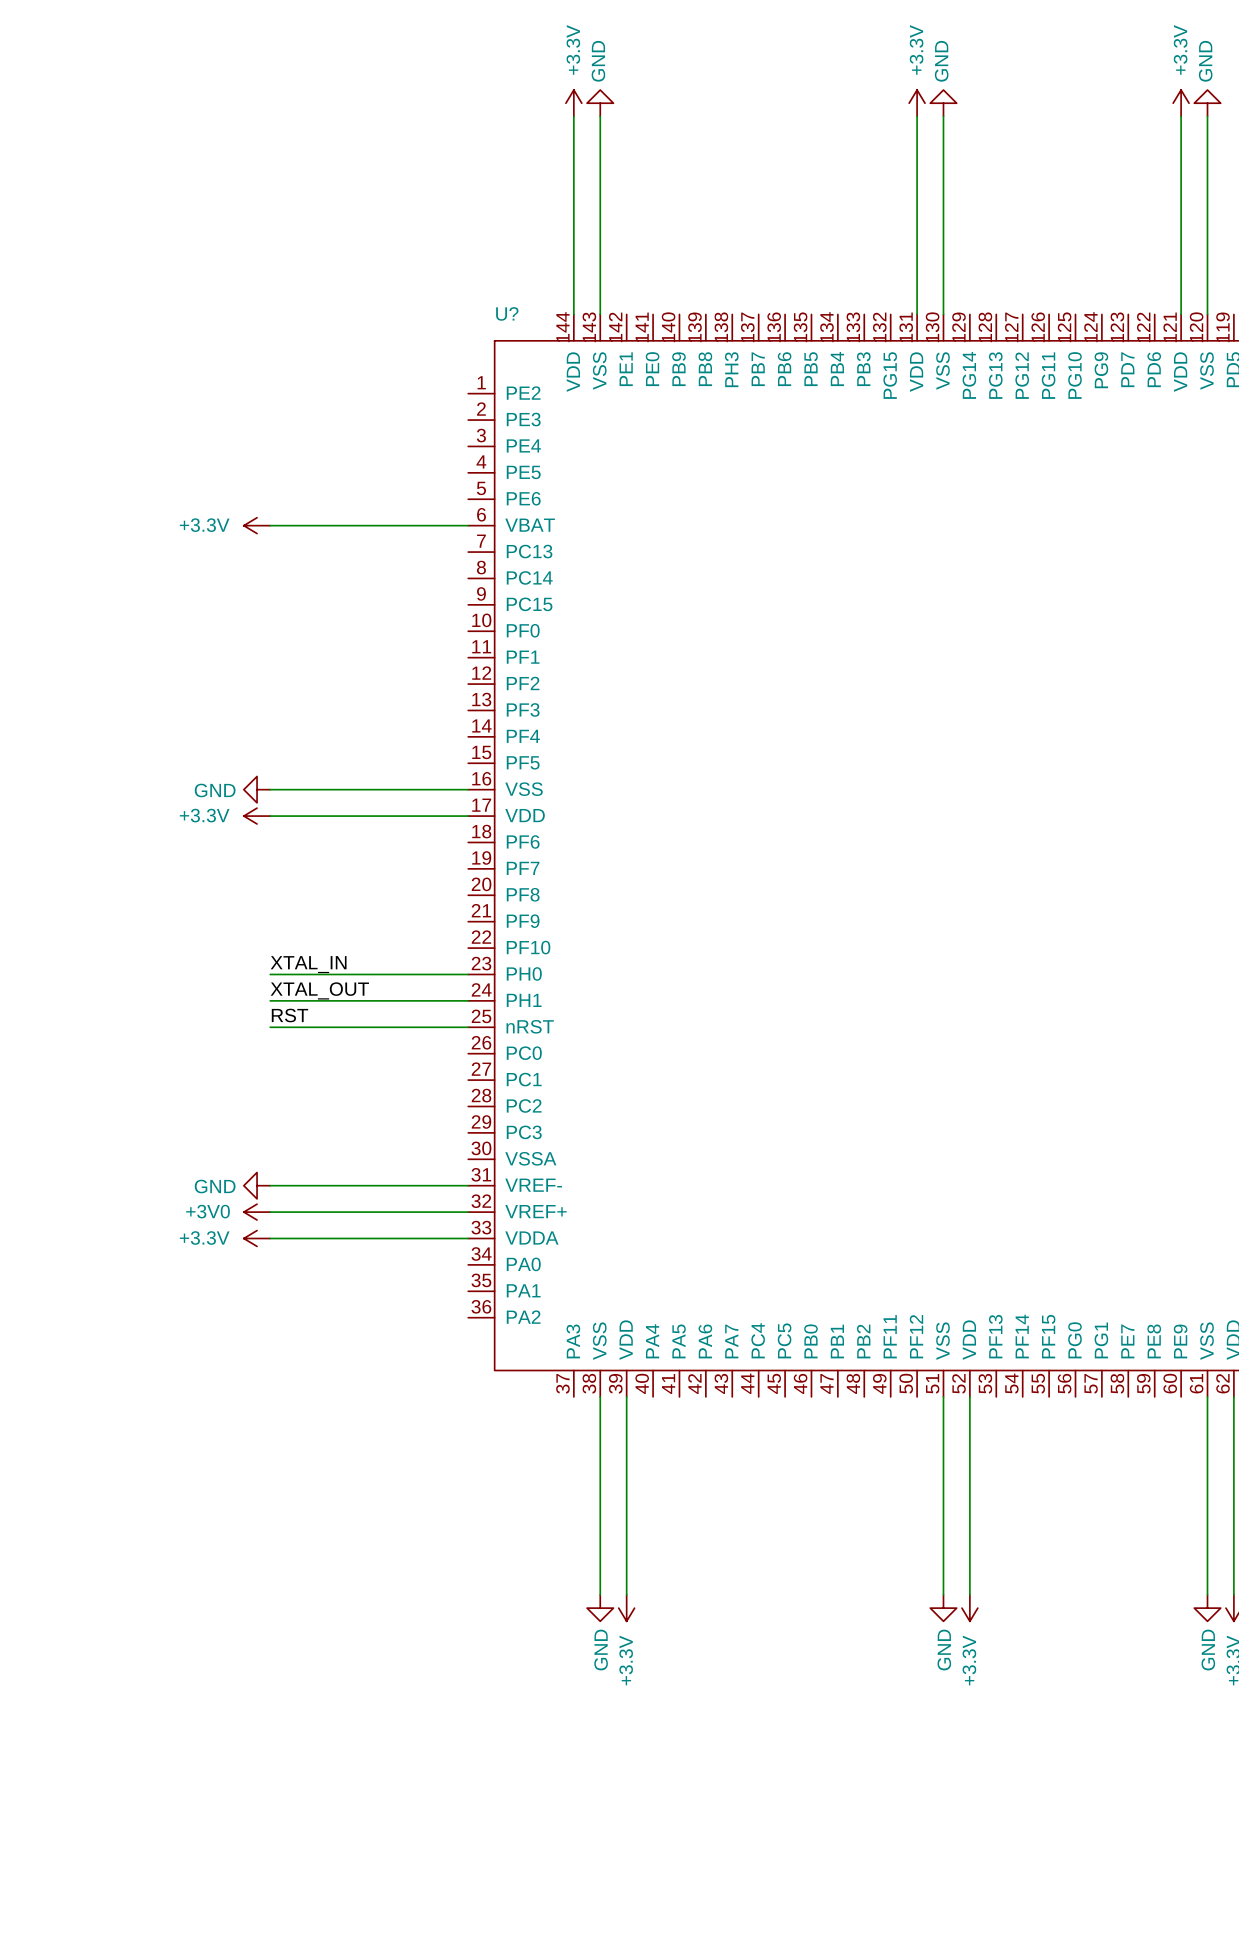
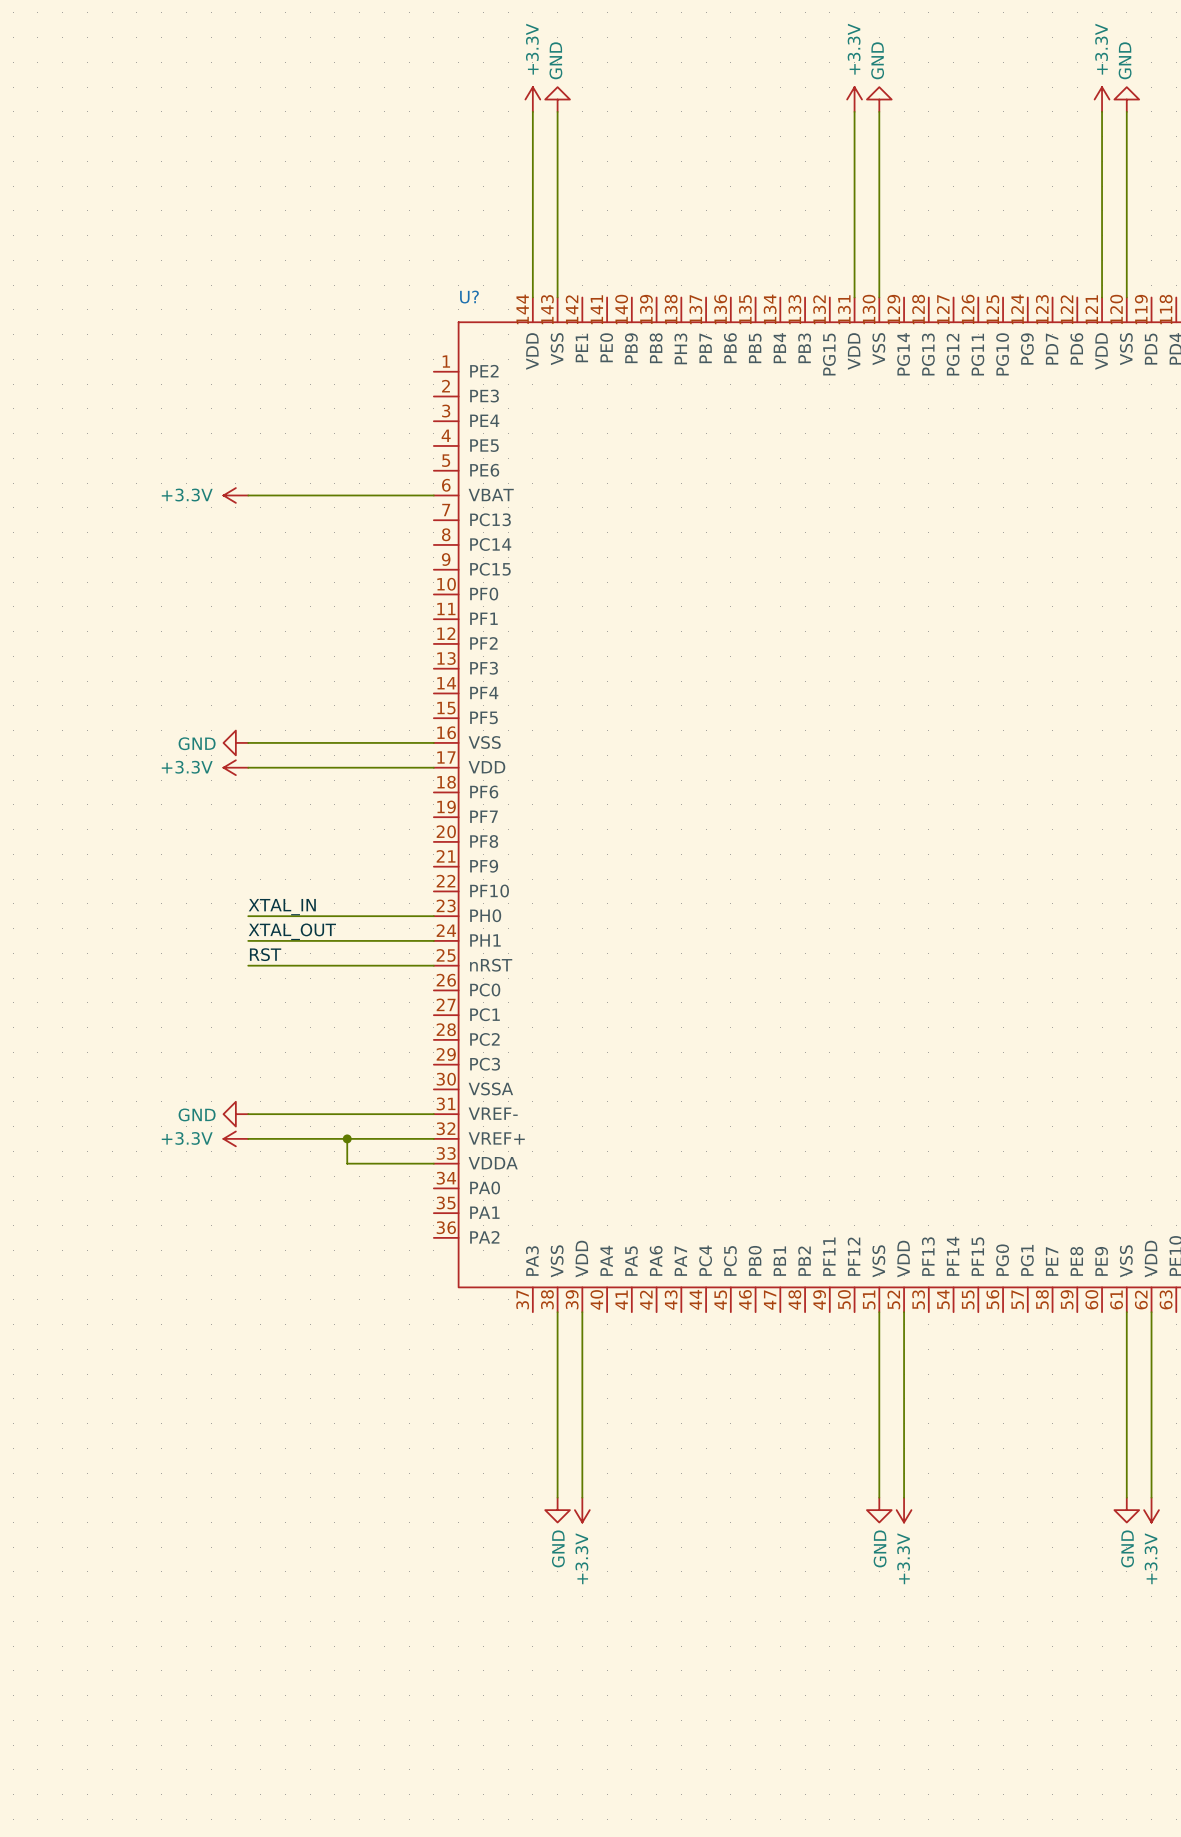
power symbol: +3V0 (257, 1212) -> +3.3V (235, 1138)
junction: none -> (347, 1138)
power symbol: +3.3V (257, 1238) -> none
wire: (270, 1238) (375, 1238) -> (347, 1138) (347, 1163)

